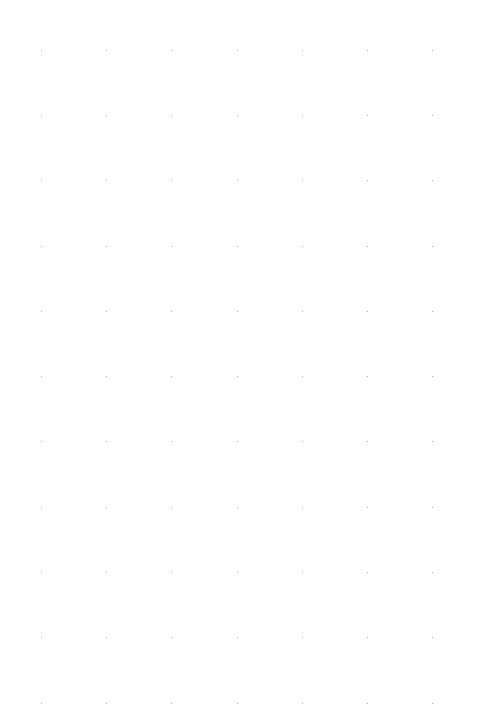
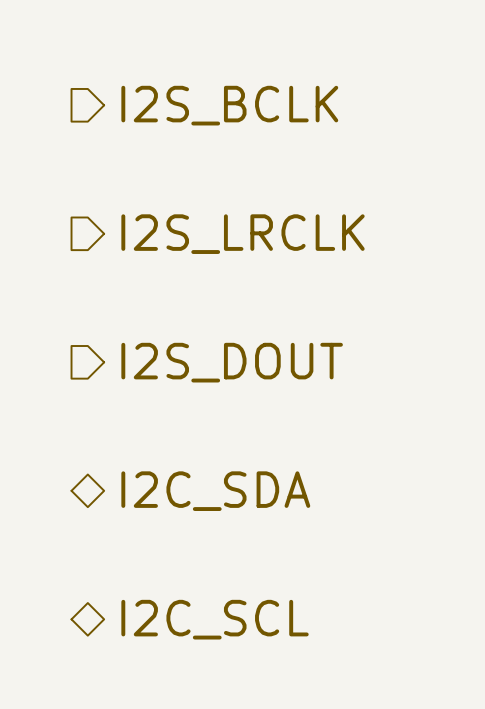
hierarchical label: none -> I2S_BCLK (229, 105)
hierarchical label: none -> I2S_LRCLK (243, 234)
hierarchical label: none -> I2S_DOUT (232, 362)
hierarchical label: none -> I2C_SDA (215, 491)
hierarchical label: none -> I2C_SCL (215, 619)

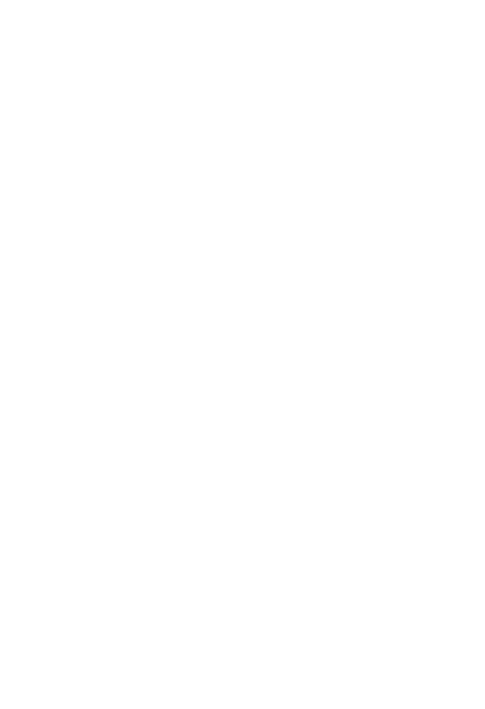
hierarchical label: I2S_BCLK (229, 105) -> none
hierarchical label: I2S_LRCLK (243, 234) -> none
hierarchical label: I2S_DOUT (232, 362) -> none
hierarchical label: I2C_SDA (215, 491) -> none
hierarchical label: I2C_SCL (215, 619) -> none

